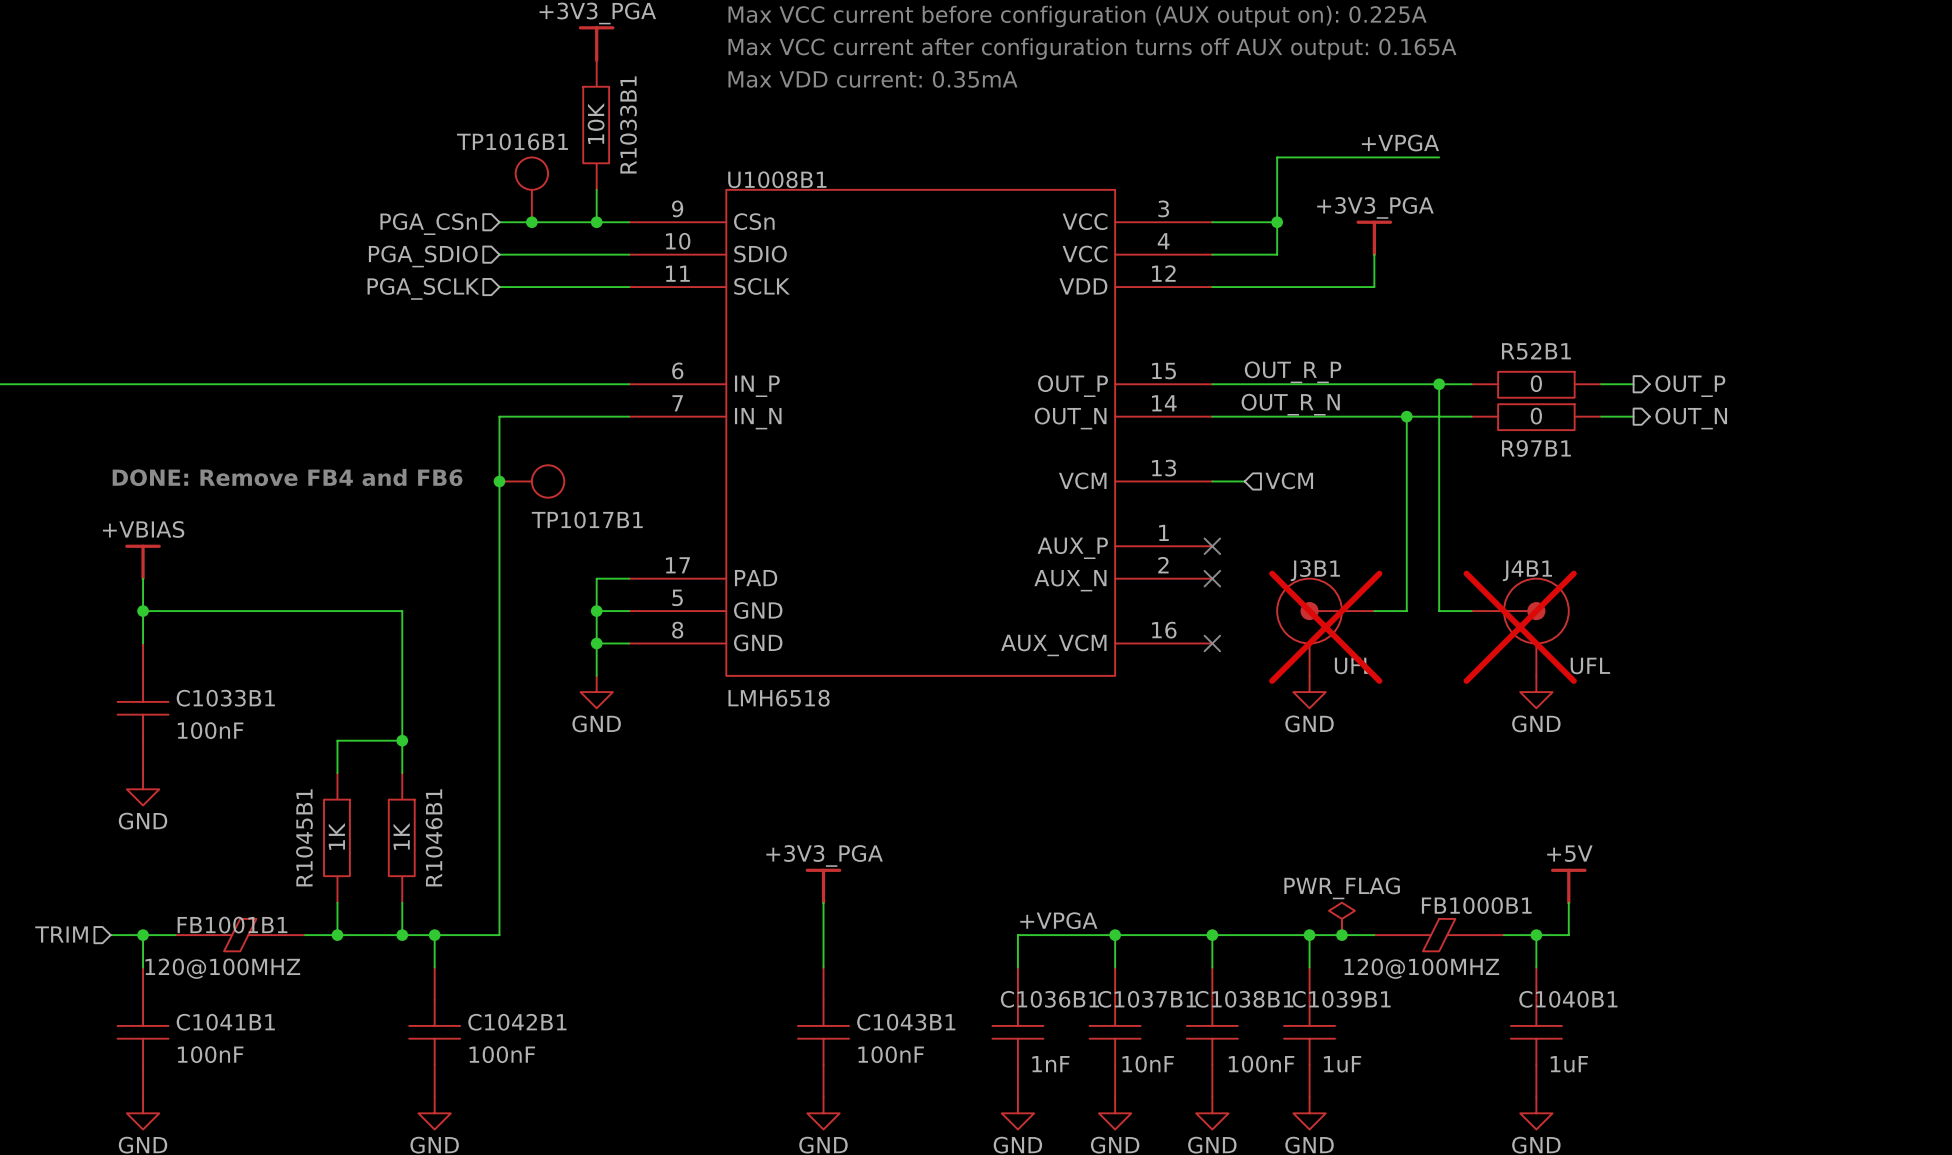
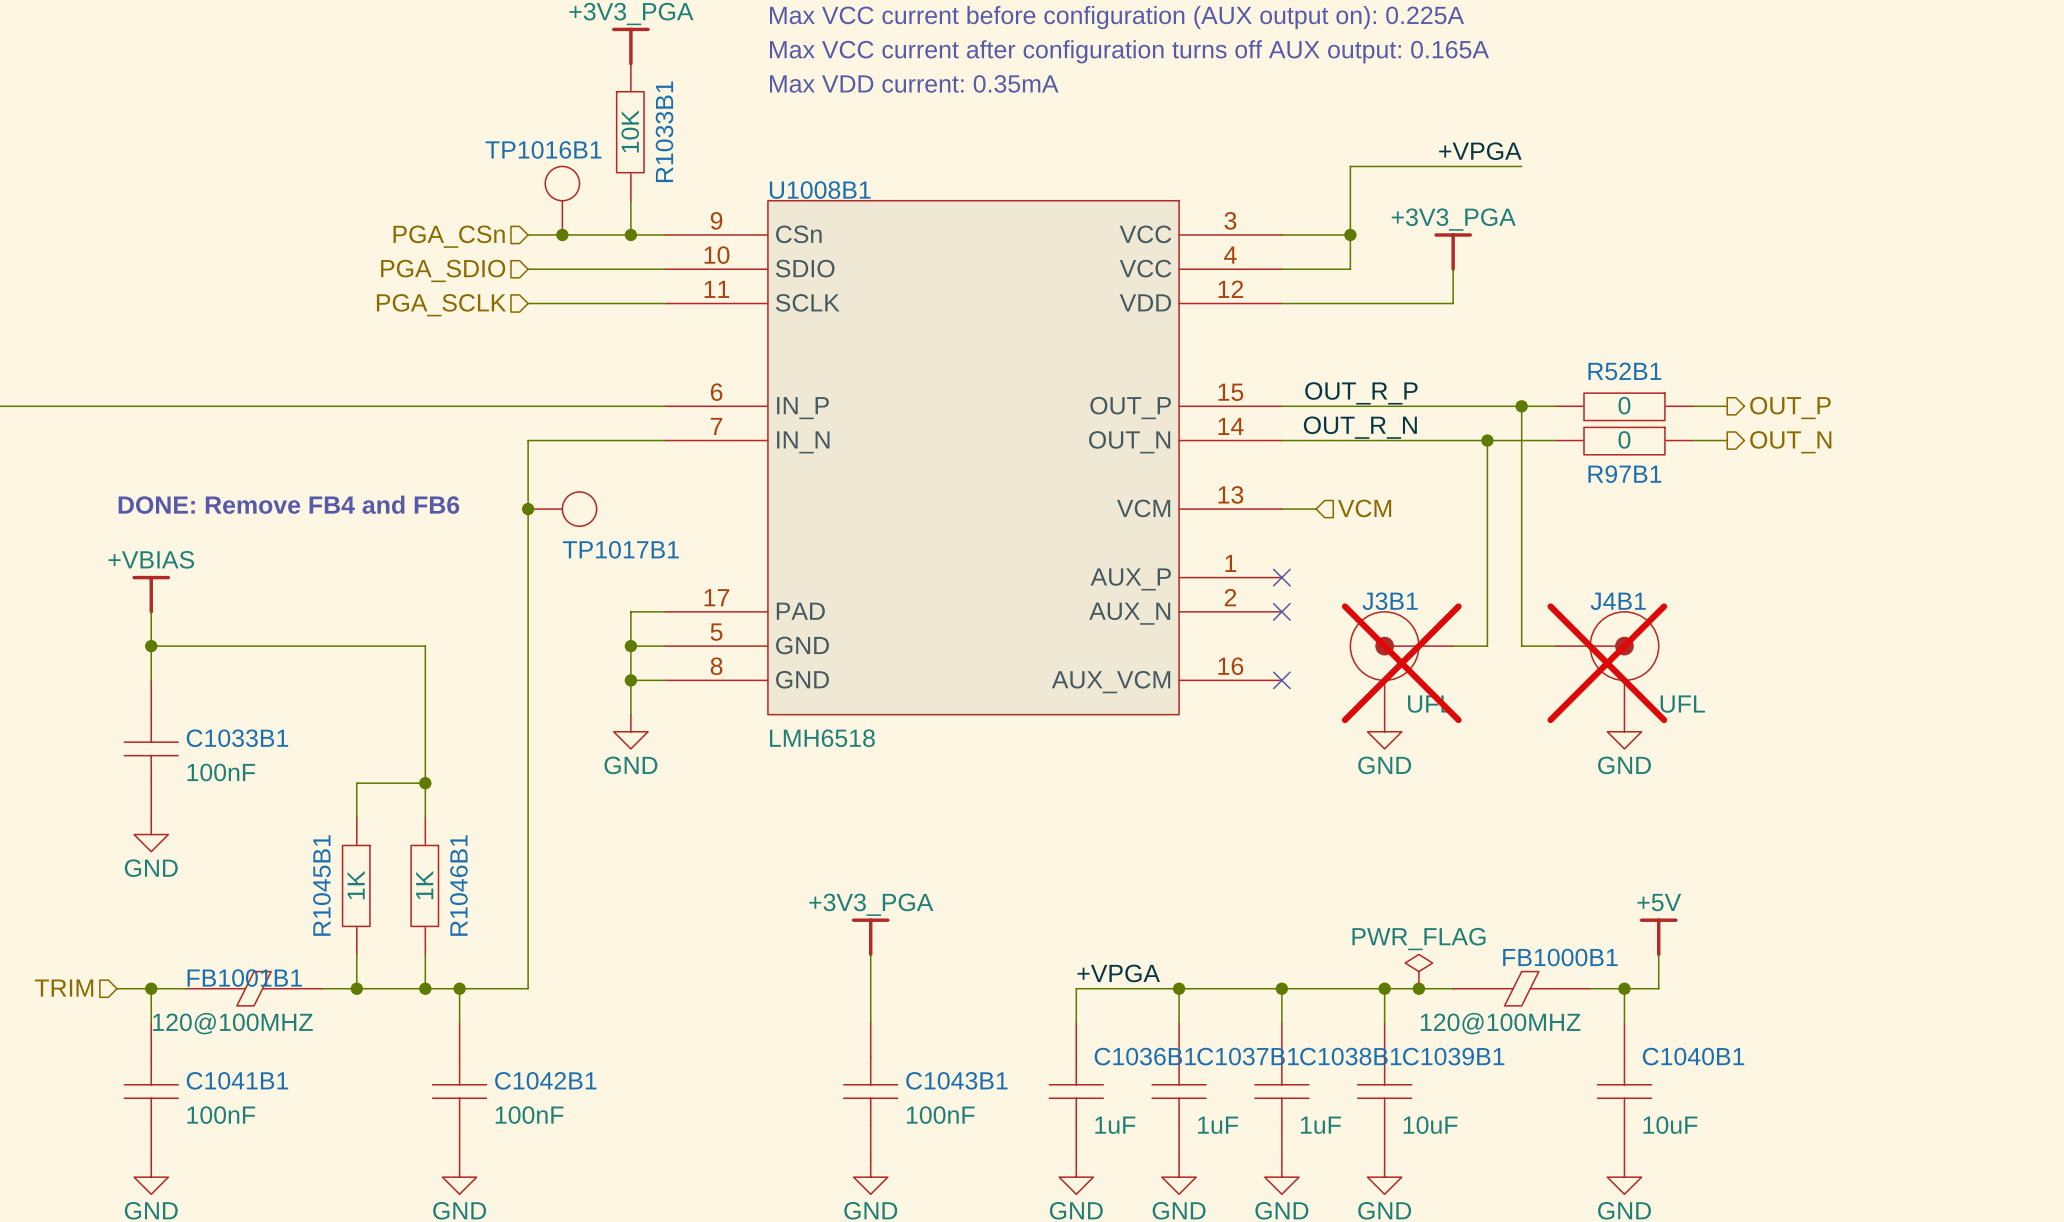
C1036B1 name position: C1036B1 (1049, 999) -> C1036B1 (1145, 1056)
C1037B1 name position: C1037B1 (1147, 999) -> C1037B1 (1248, 1056)
C1038B1 name position: C1038B1 (1244, 999) -> C1038B1 (1350, 1056)
C1039B1 name position: C1039B1 (1341, 999) -> C1039B1 (1453, 1056)
C1040B1 name position: C1040B1 (1568, 999) -> C1040B1 (1693, 1056)
C1036B1 value: 1nF (1050, 1064) -> 1uF (1115, 1125)
C1037B1 value: 10nF (1148, 1064) -> 1uF (1218, 1125)
C1038B1 value: 100nF (1261, 1064) -> 1uF (1320, 1125)
C1039B1 value: 1uF (1342, 1064) -> 10uF (1430, 1125)
C1040B1 value: 1uF (1569, 1064) -> 10uF (1670, 1125)

